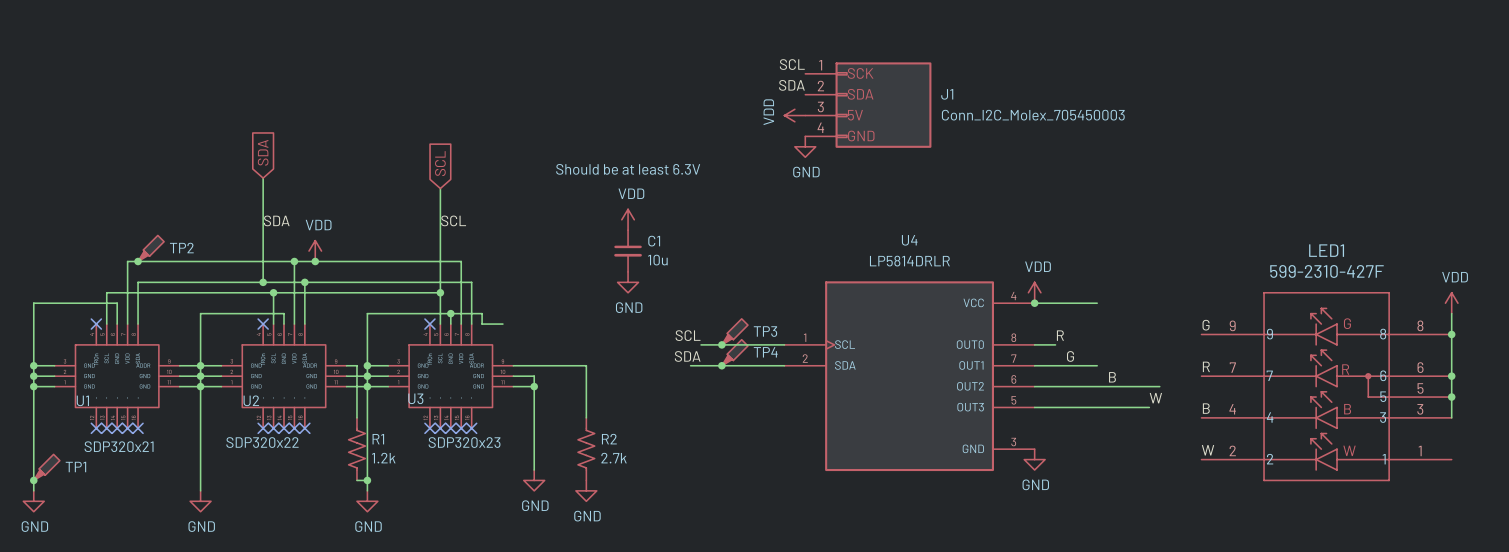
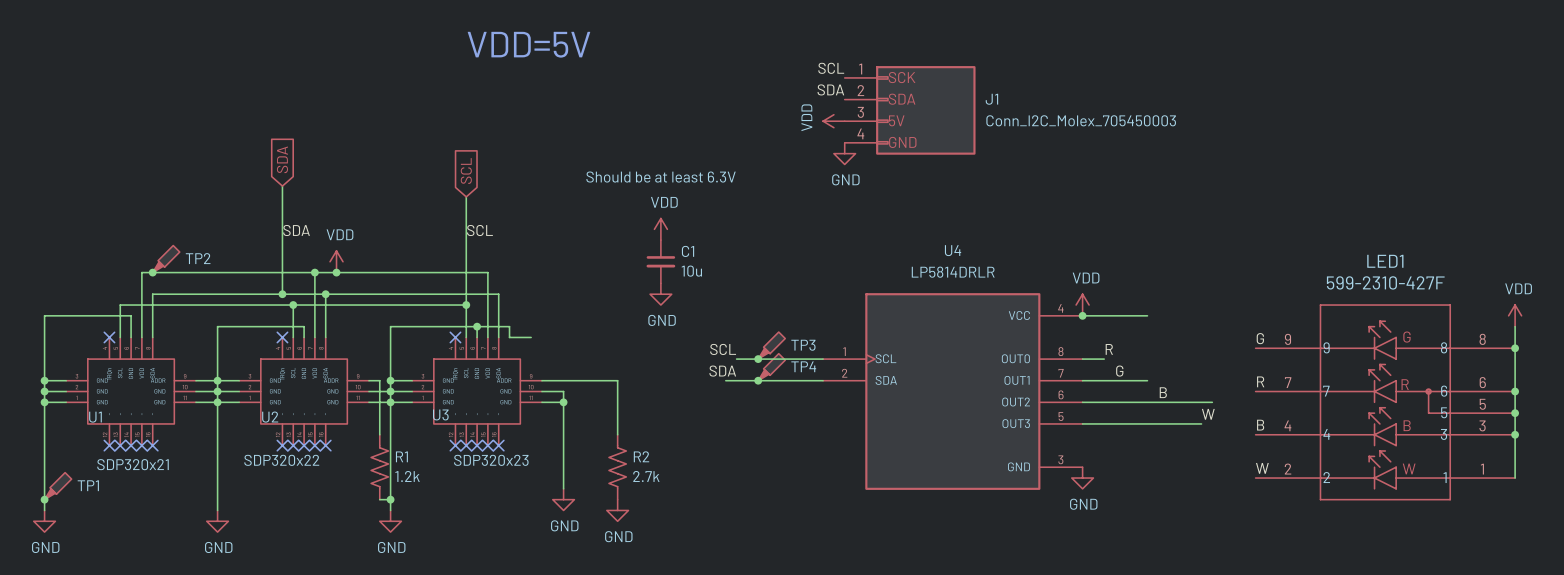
text: none -> VDD=5V (529, 44)
wire: none -> (1515, 434) (1515, 478)
junction: none -> (1515, 434)

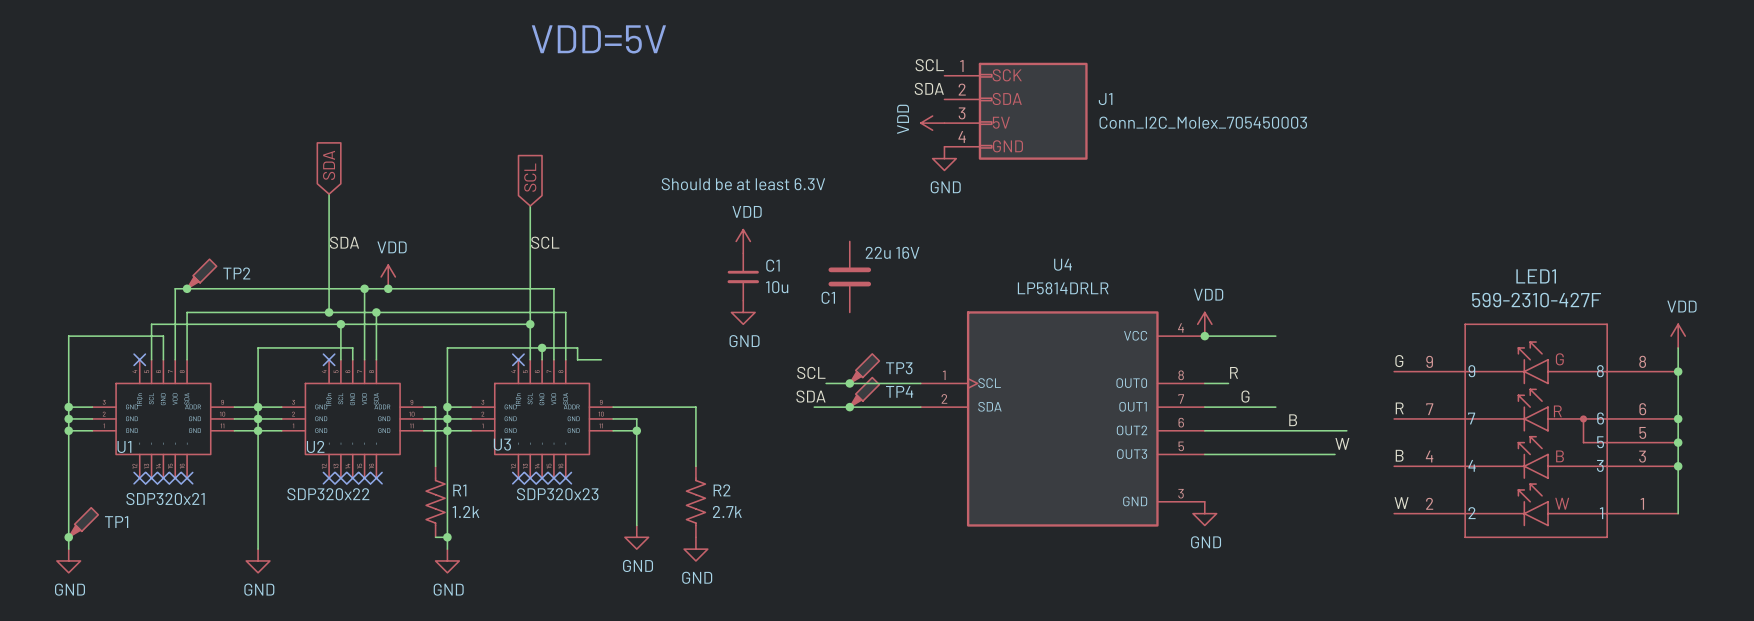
C1: none -> 22u 16V (849, 276)

